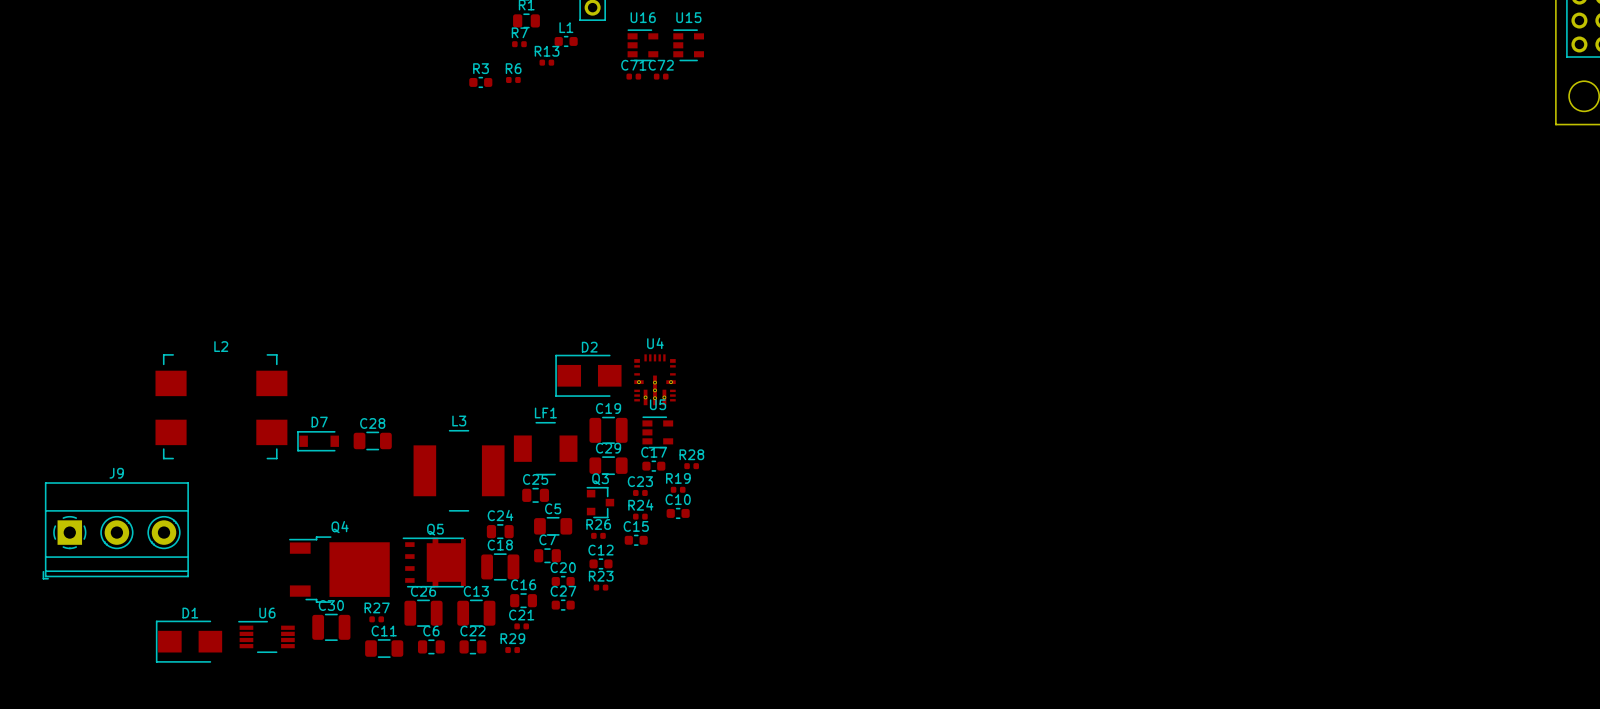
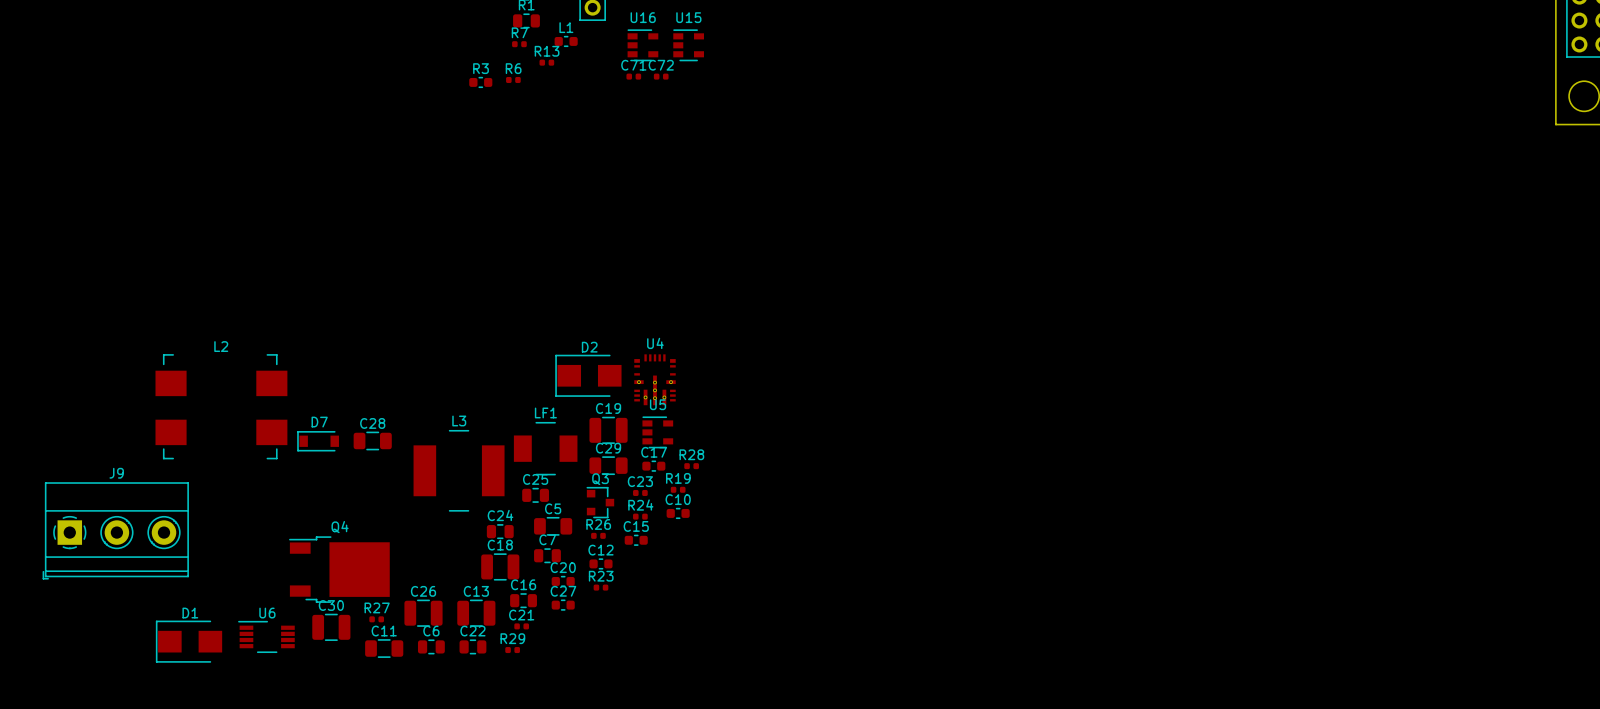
Q5: (434, 562) -> none

